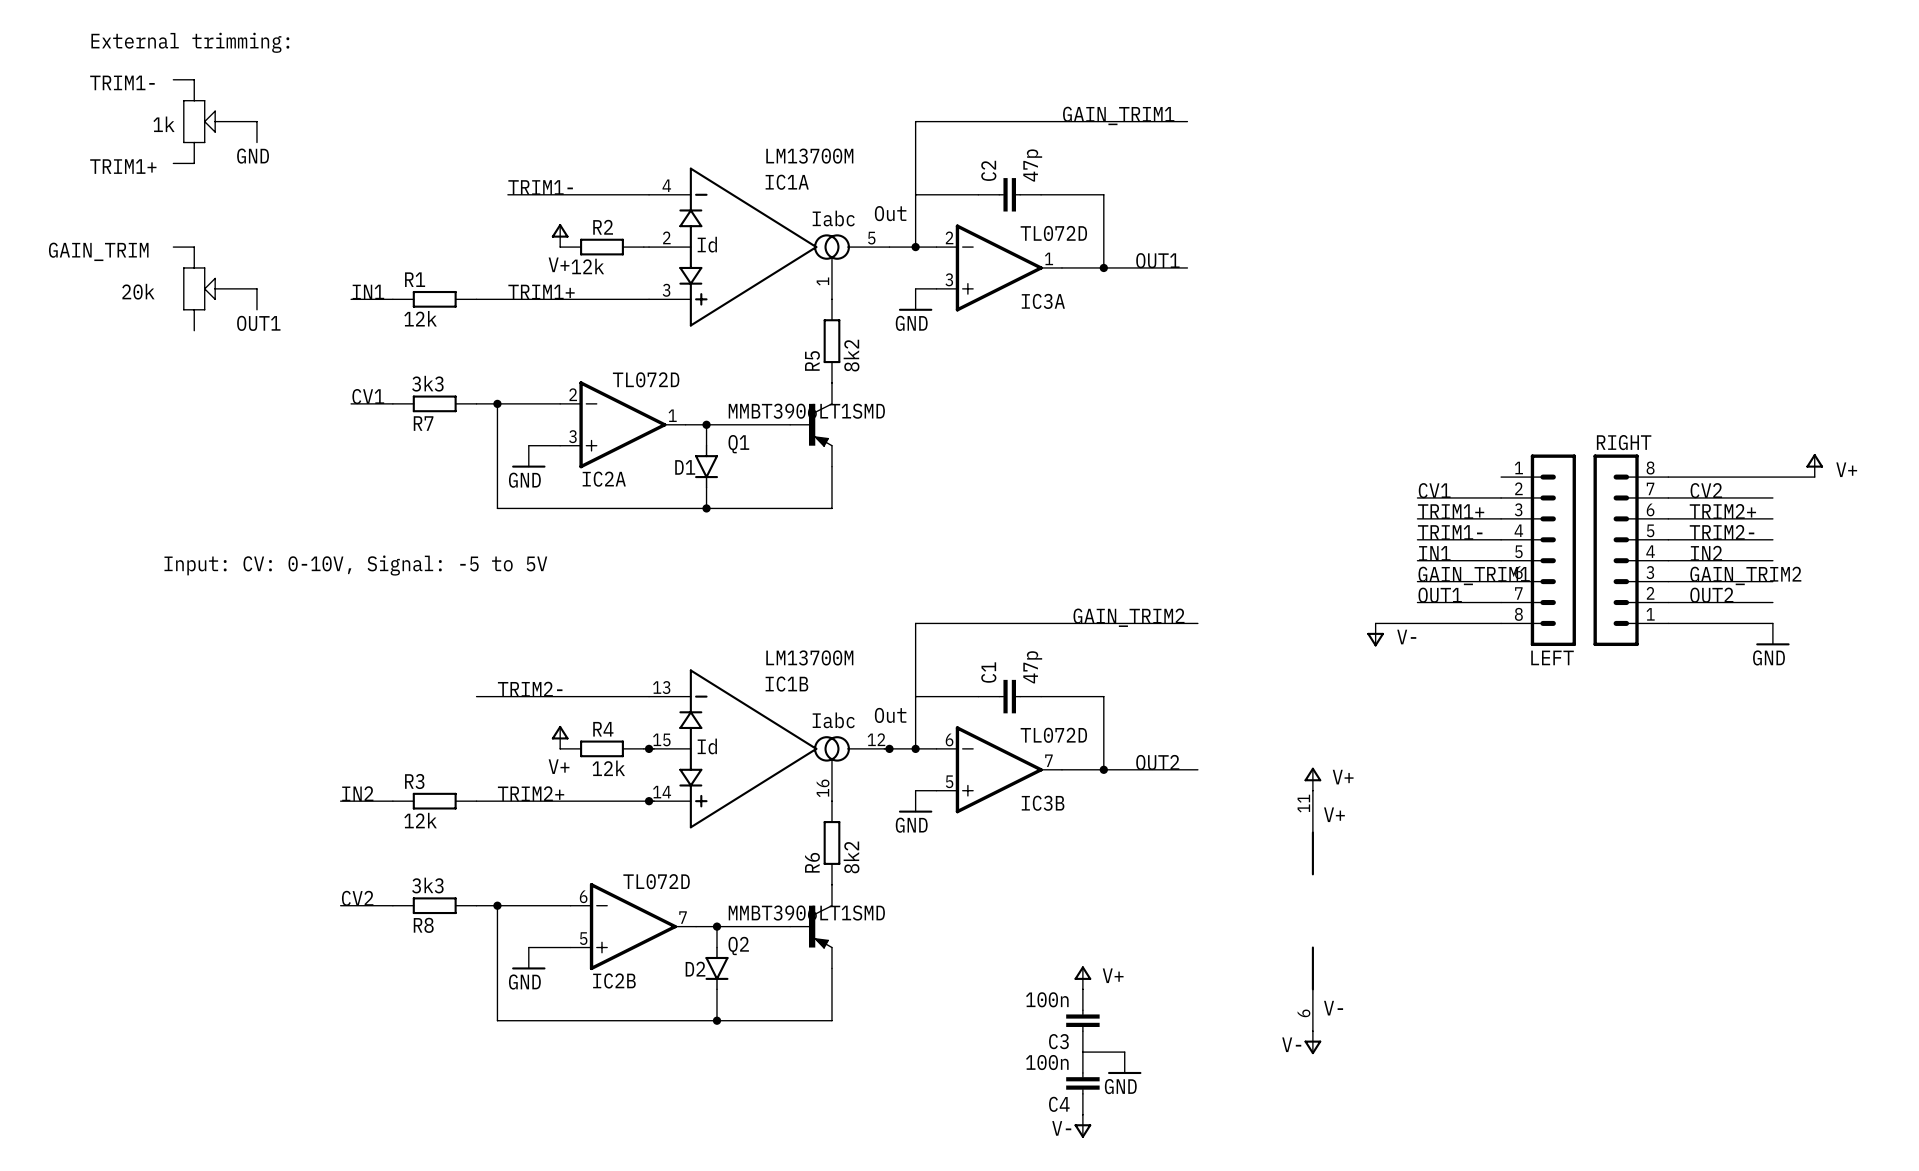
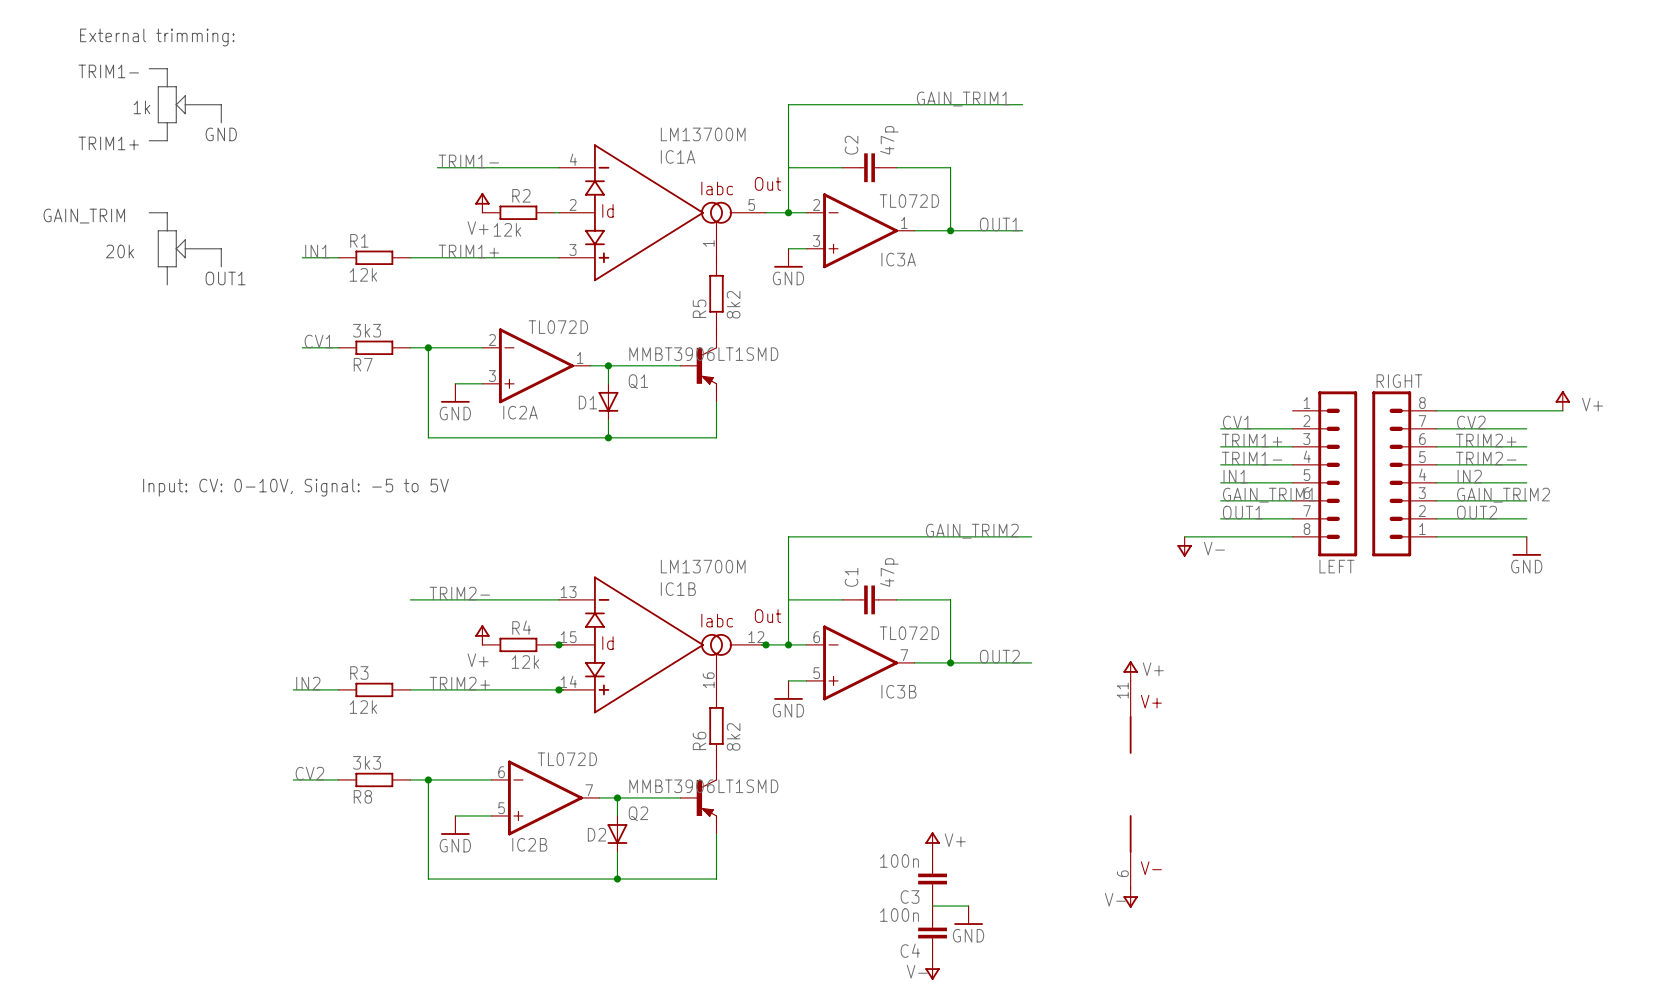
D1 symbol: [695, 444, 719, 489] -> [598, 383, 619, 420]
D2 symbol: [705, 946, 729, 991] -> [607, 815, 628, 853]

